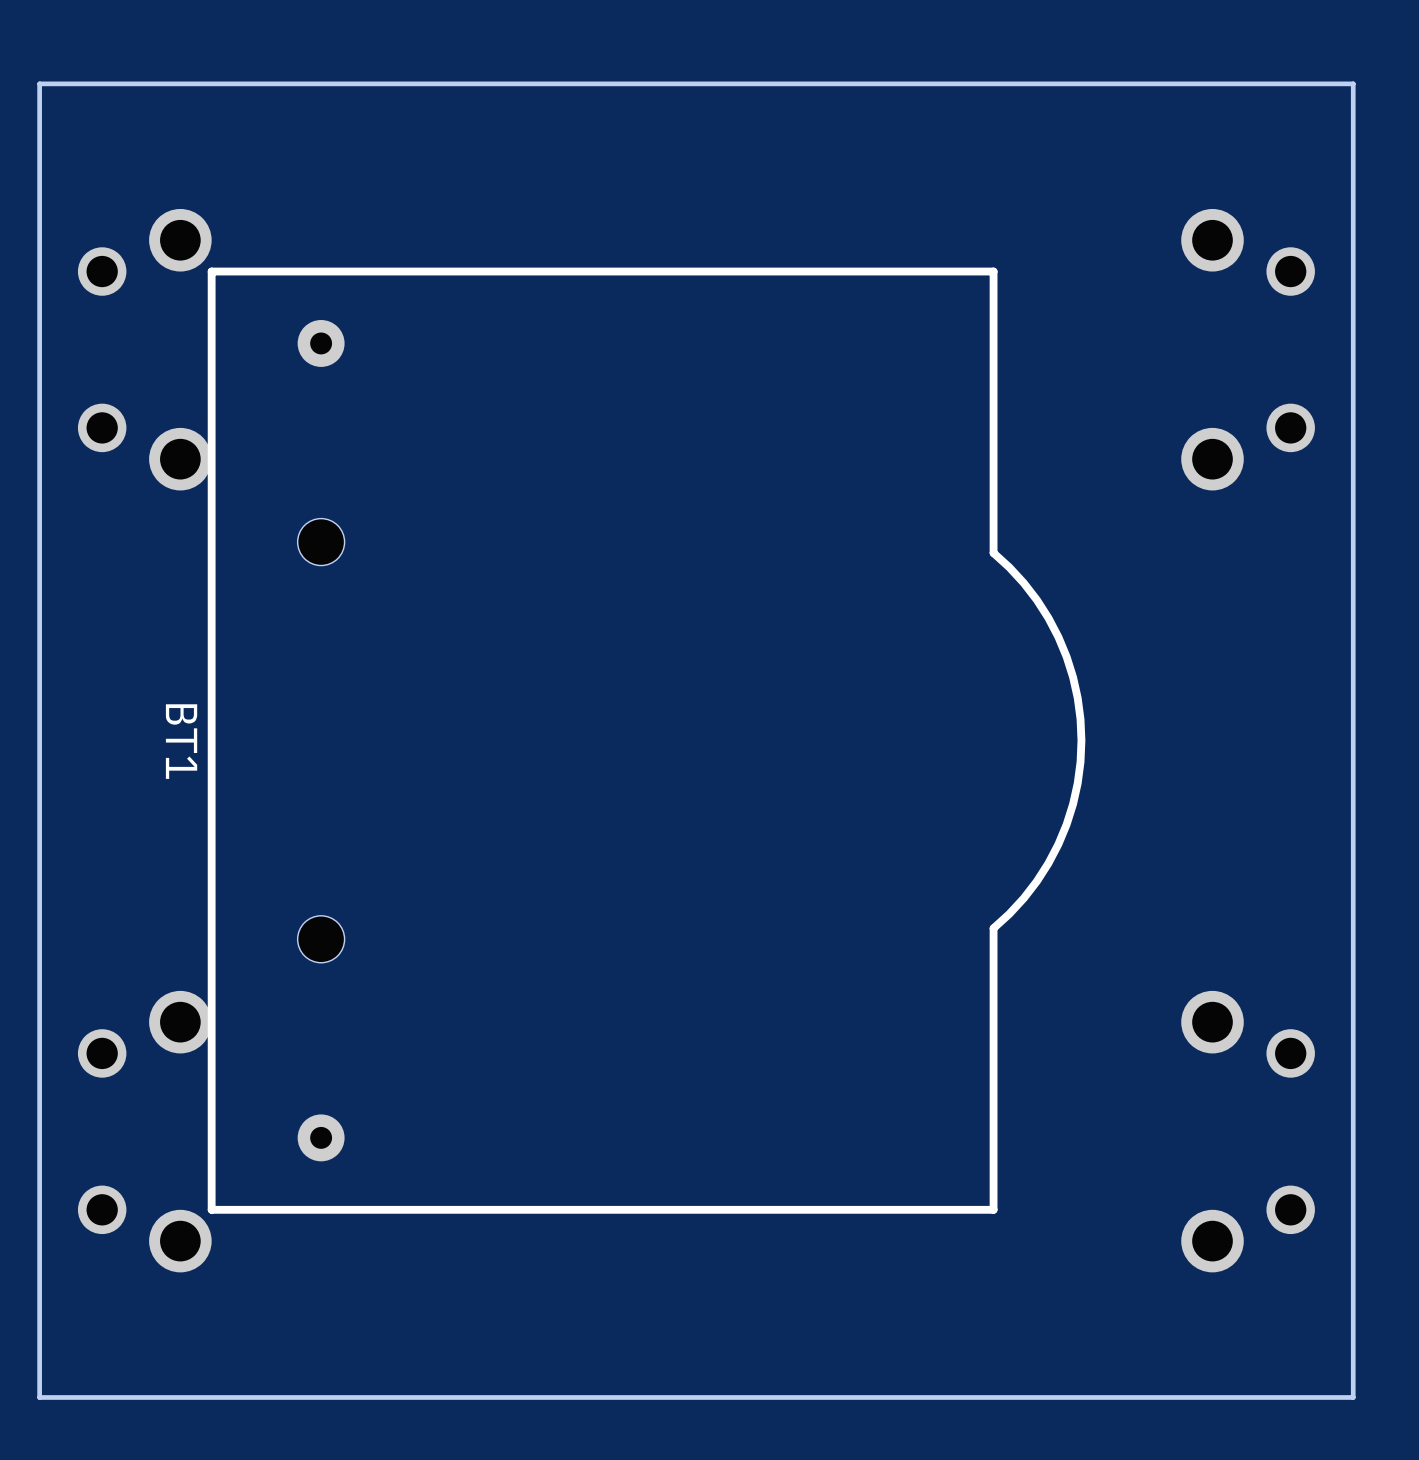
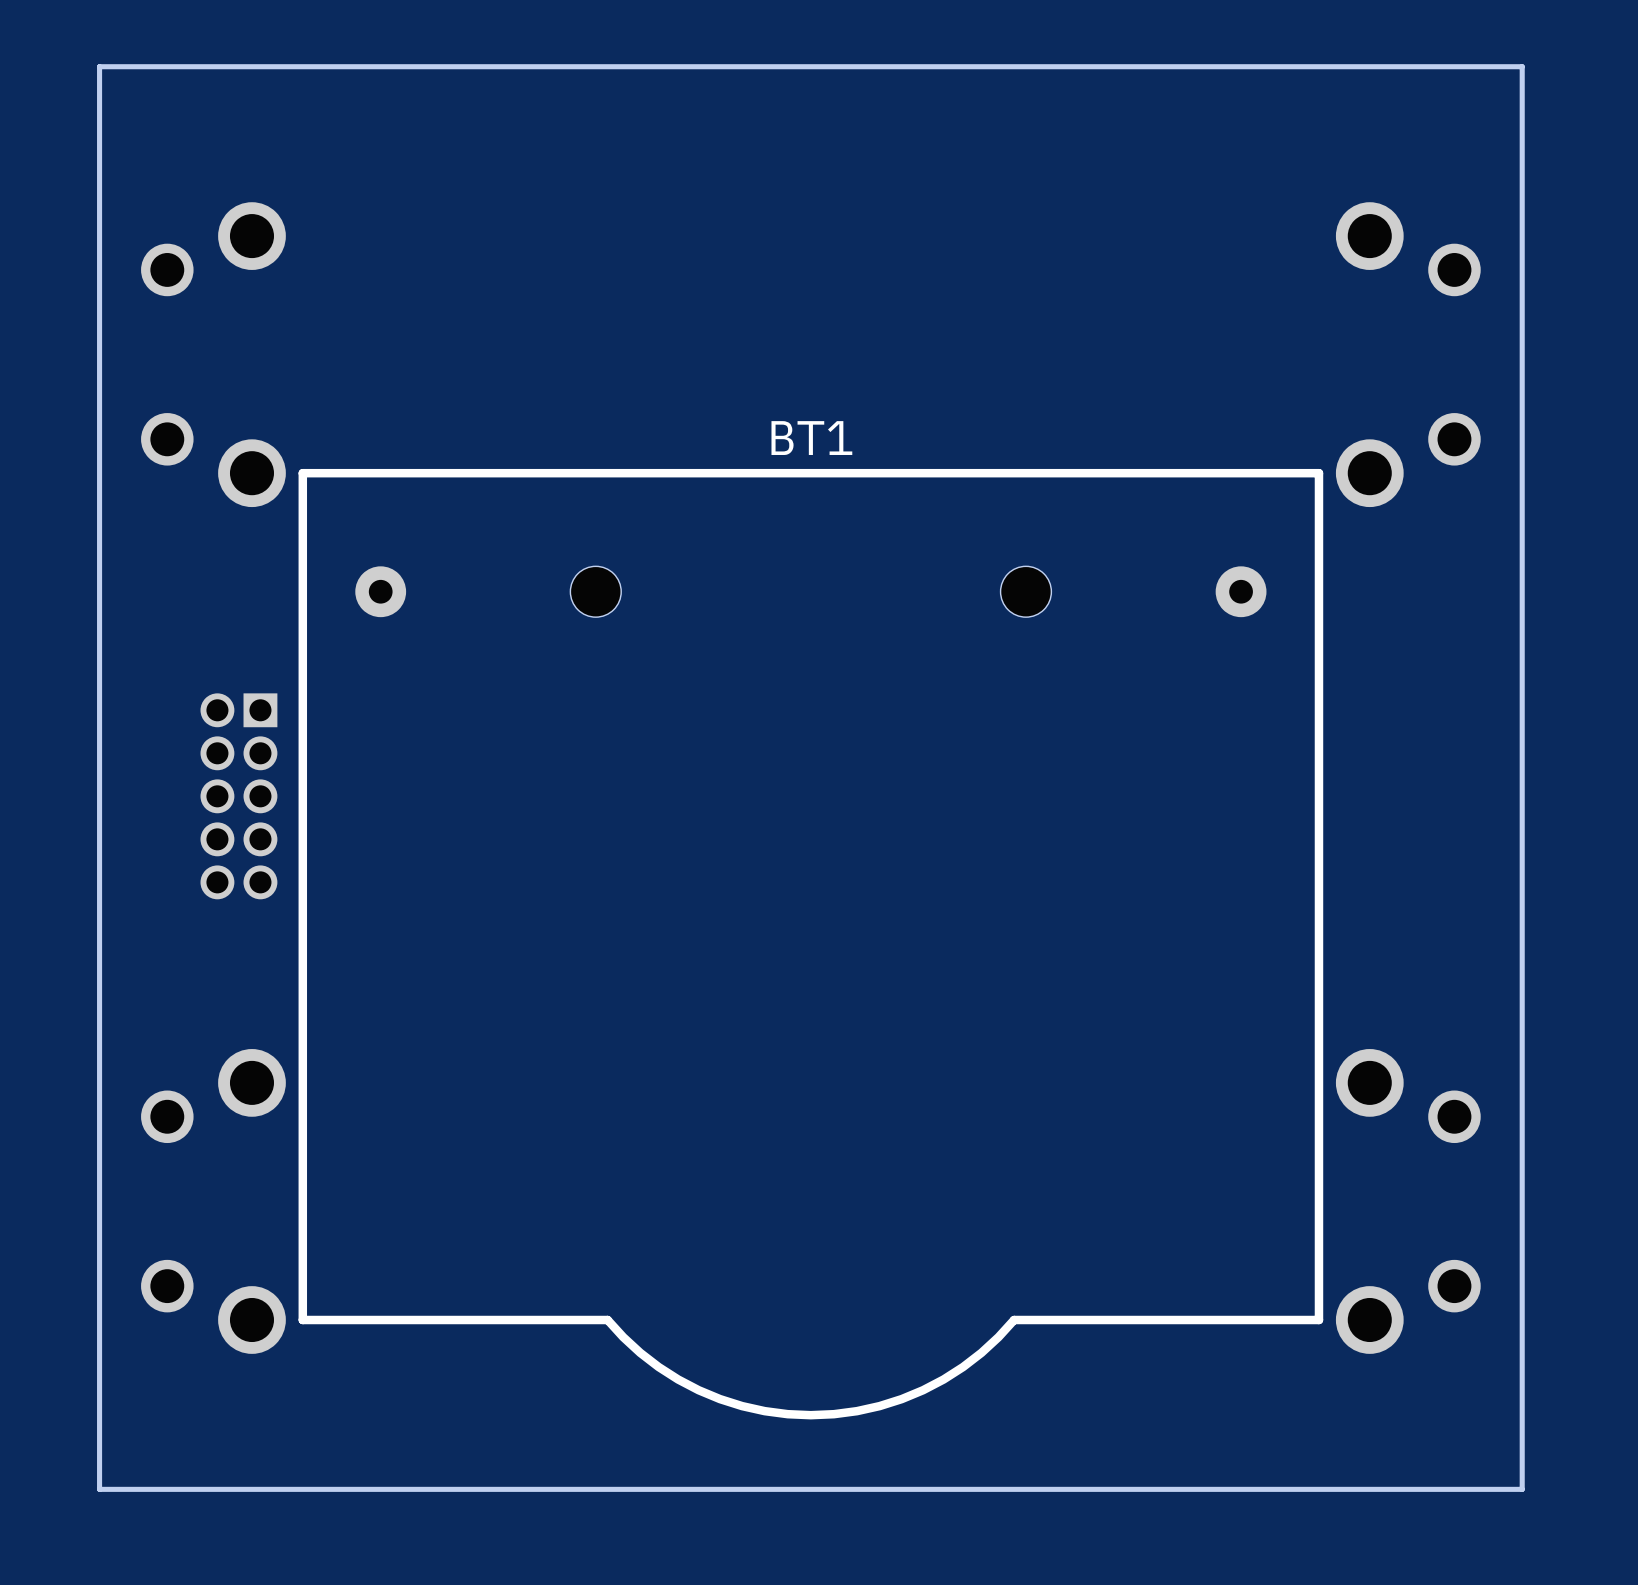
BT1 rotation: 0° (646, 740) -> 90° clockwise (810, 944)
part: none -> (238, 796)

